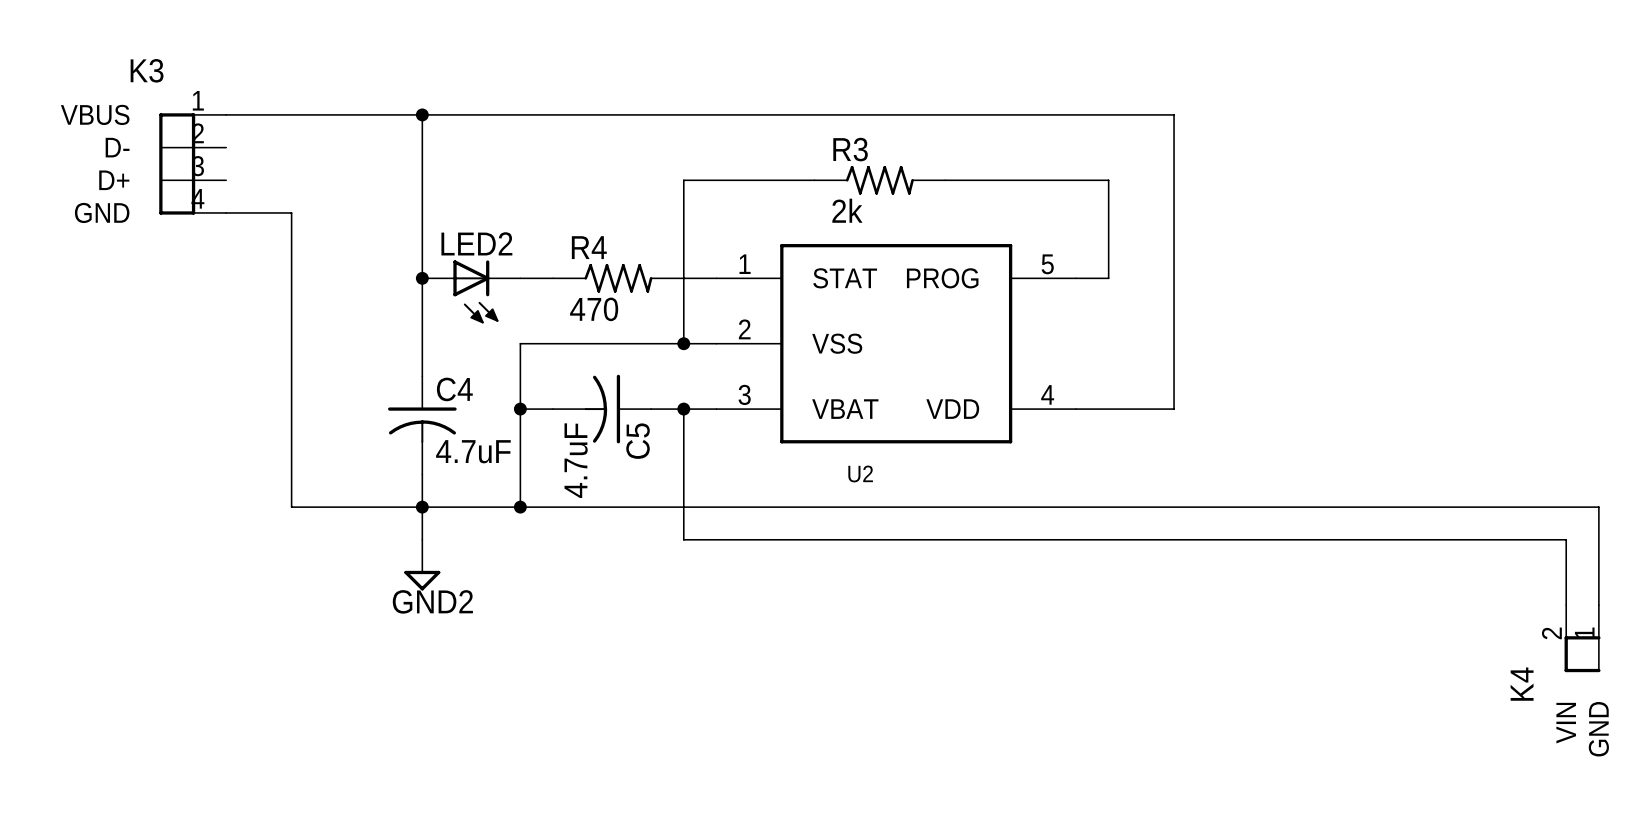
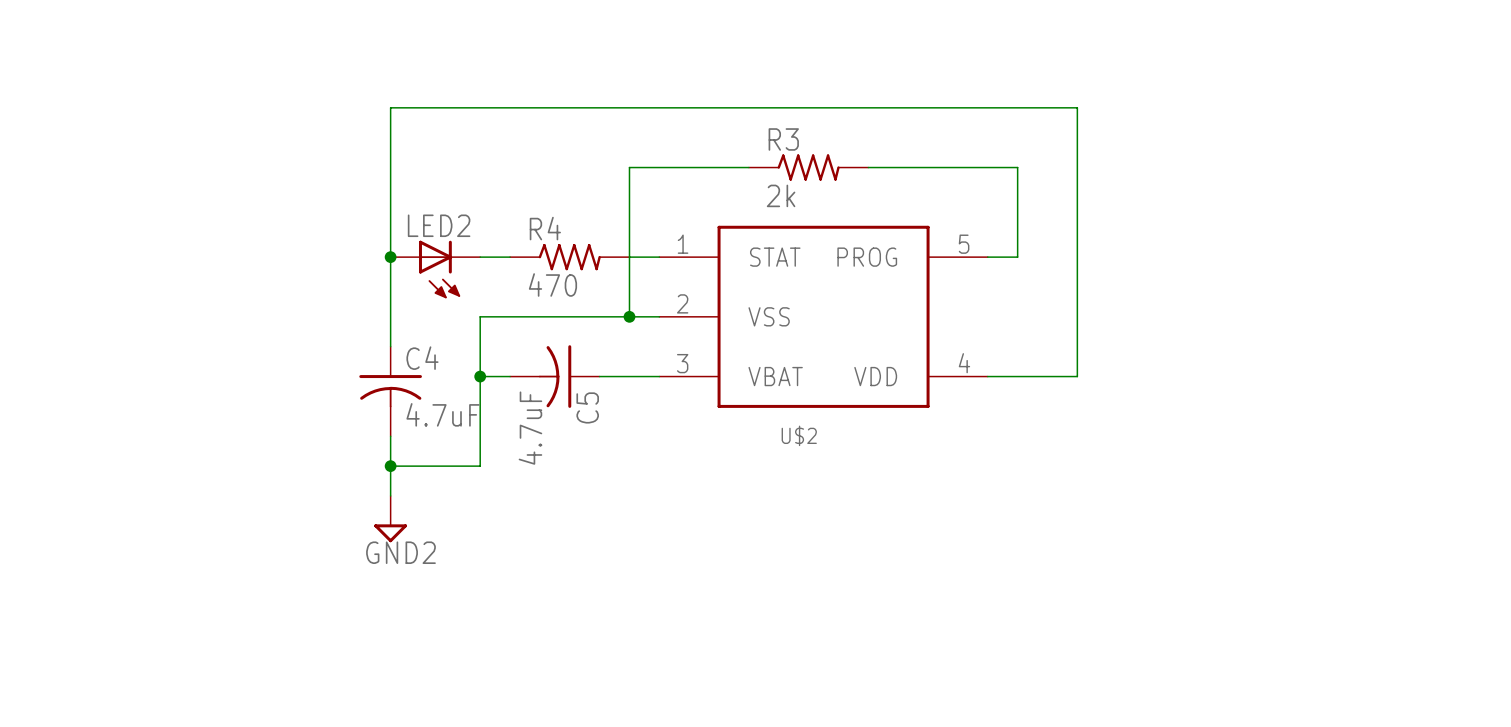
wire: (226, 114) (422, 114) -> none
junction: (422, 114) -> none
K3: (192, 163) -> none
wire: (226, 212) (291, 212) (291, 507) (422, 507) -> none
wire: (683, 409) (683, 539) (1566, 539) (1566, 605) -> none
junction: (683, 409) -> none
U2 name: U2 (860, 473) -> U$2 (799, 435)
wire: (520, 507) (1598, 507) (1598, 605) -> none
junction: (520, 507) -> none
K4: (1582, 638) -> none

